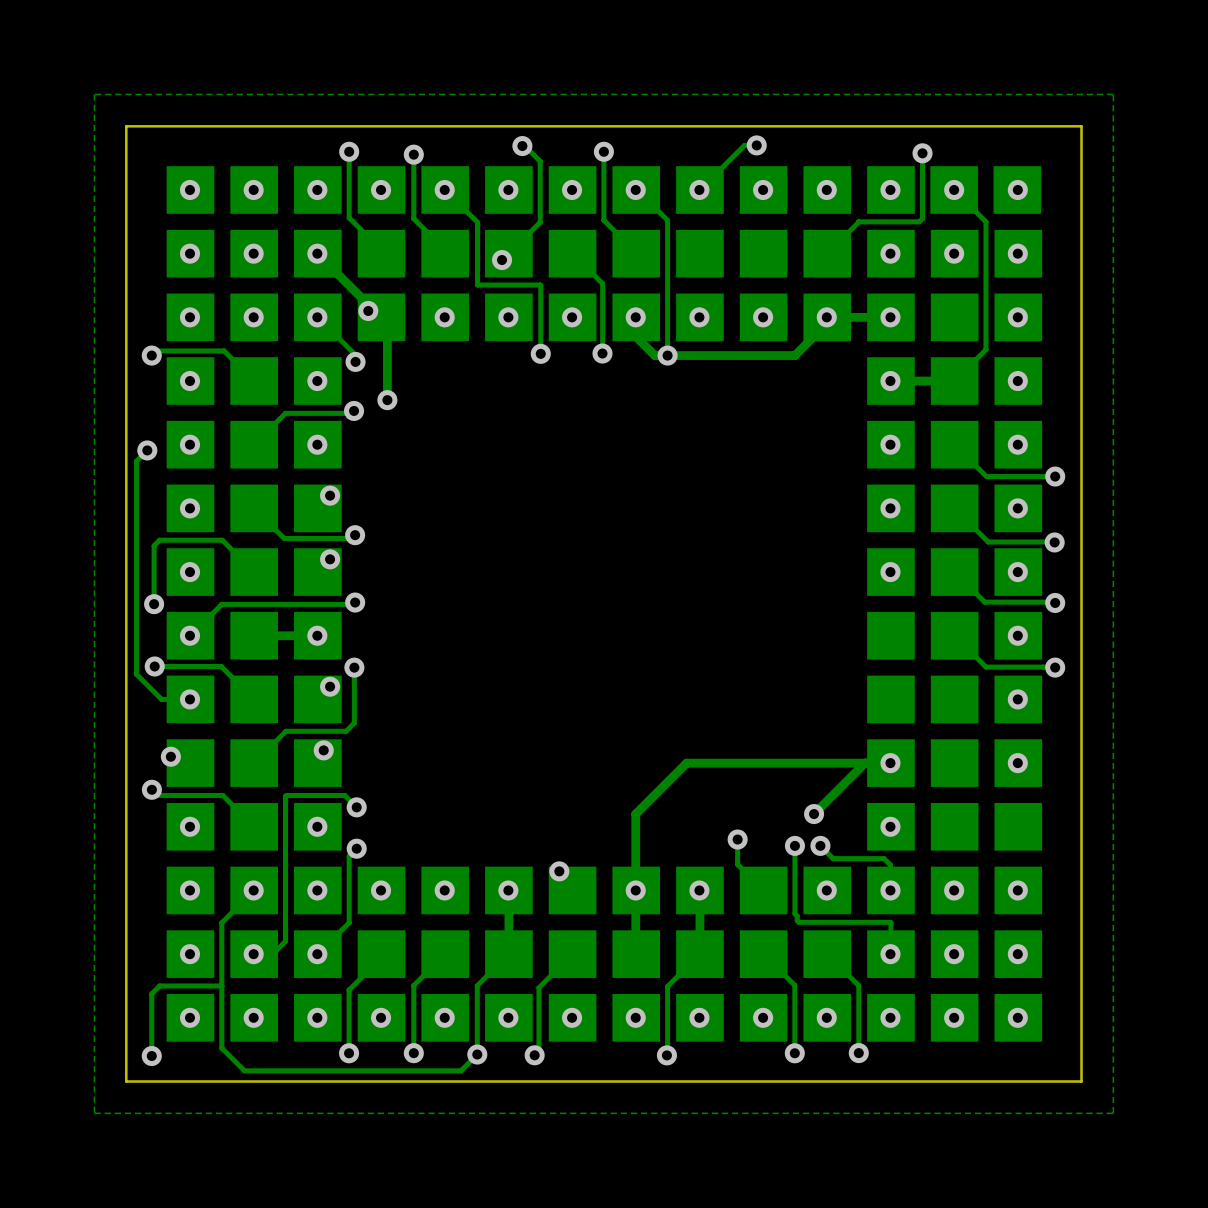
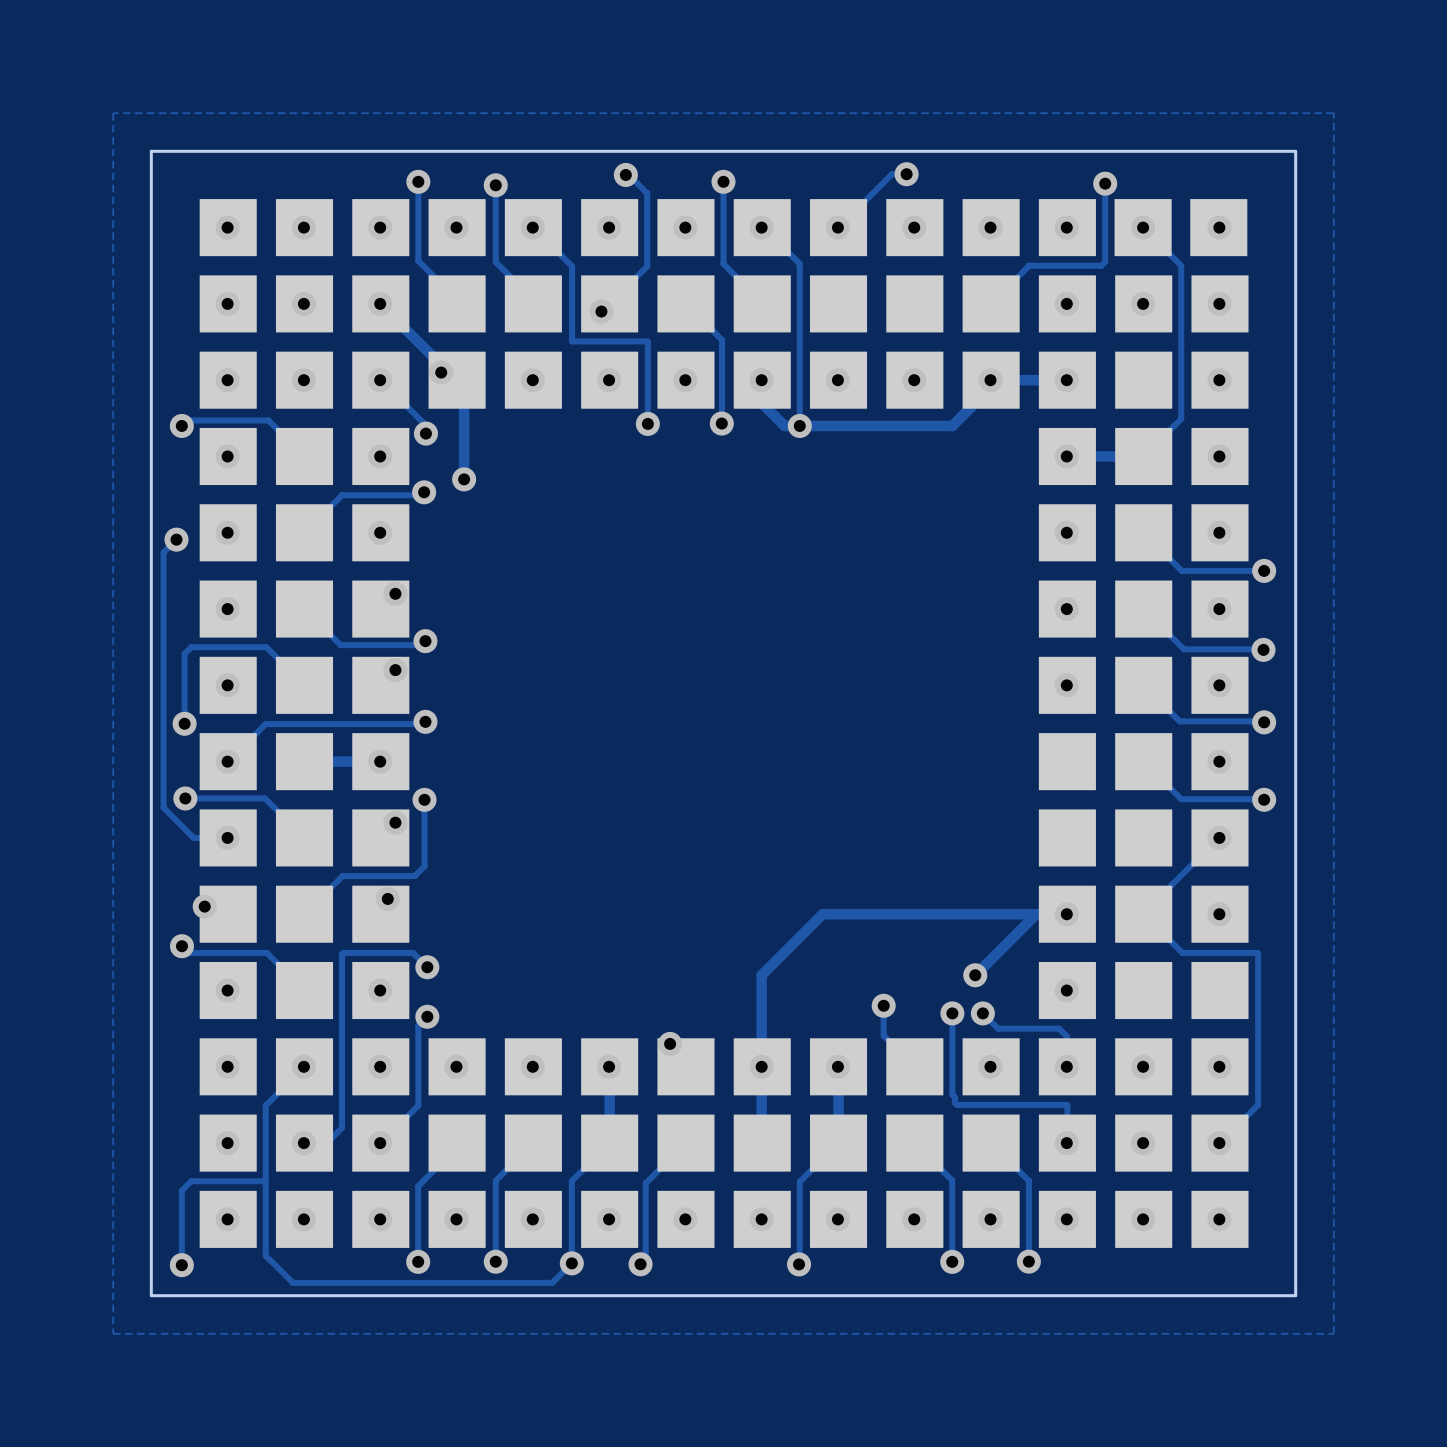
track: none -> (1219, 837) (1143, 913) (1182, 952) (1258, 953) (1258, 1104) (1219, 1143)

